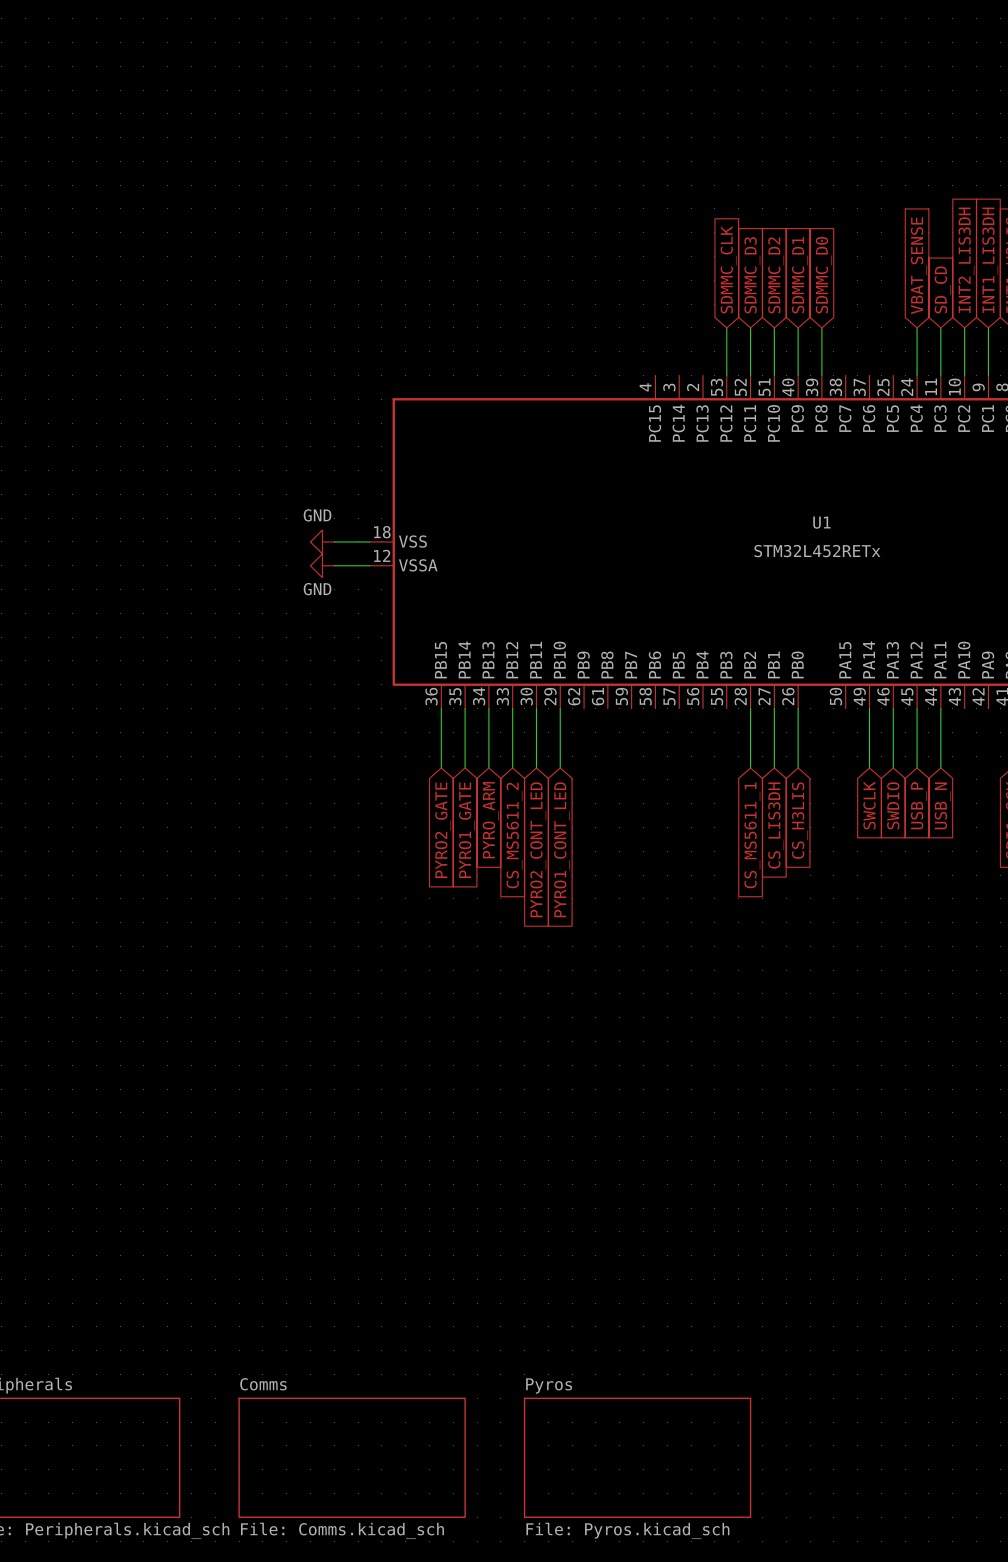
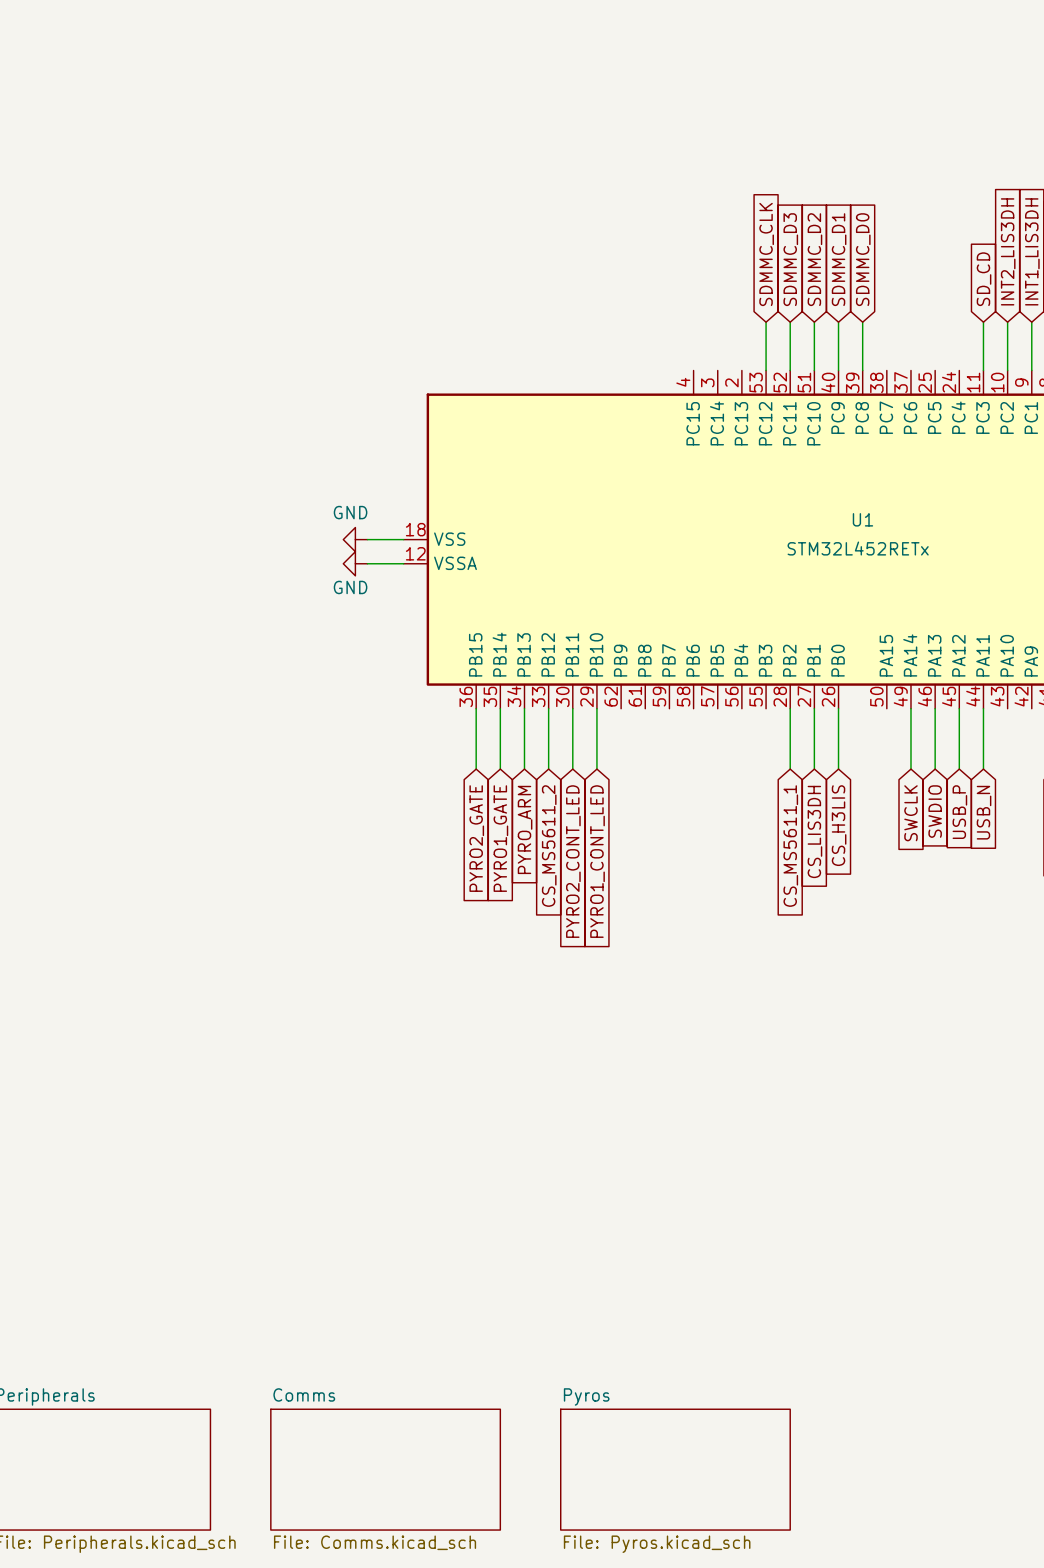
global label: VBAT_SENSE (918, 265) -> none
wire: (917, 327) (917, 375) -> none

